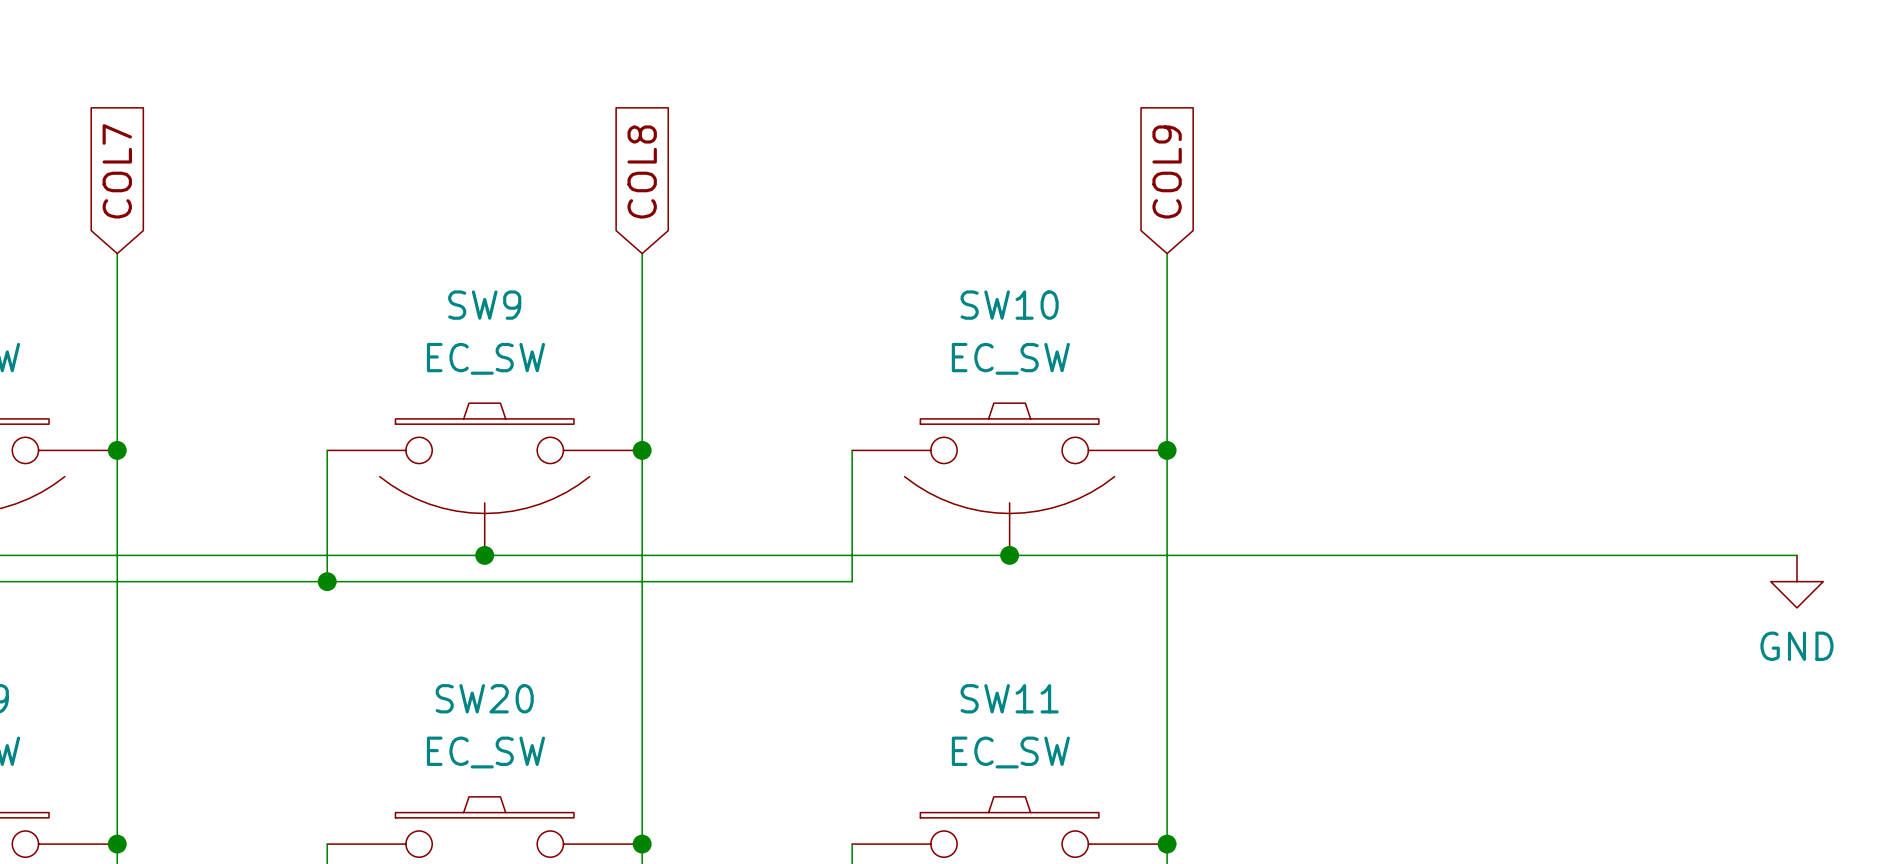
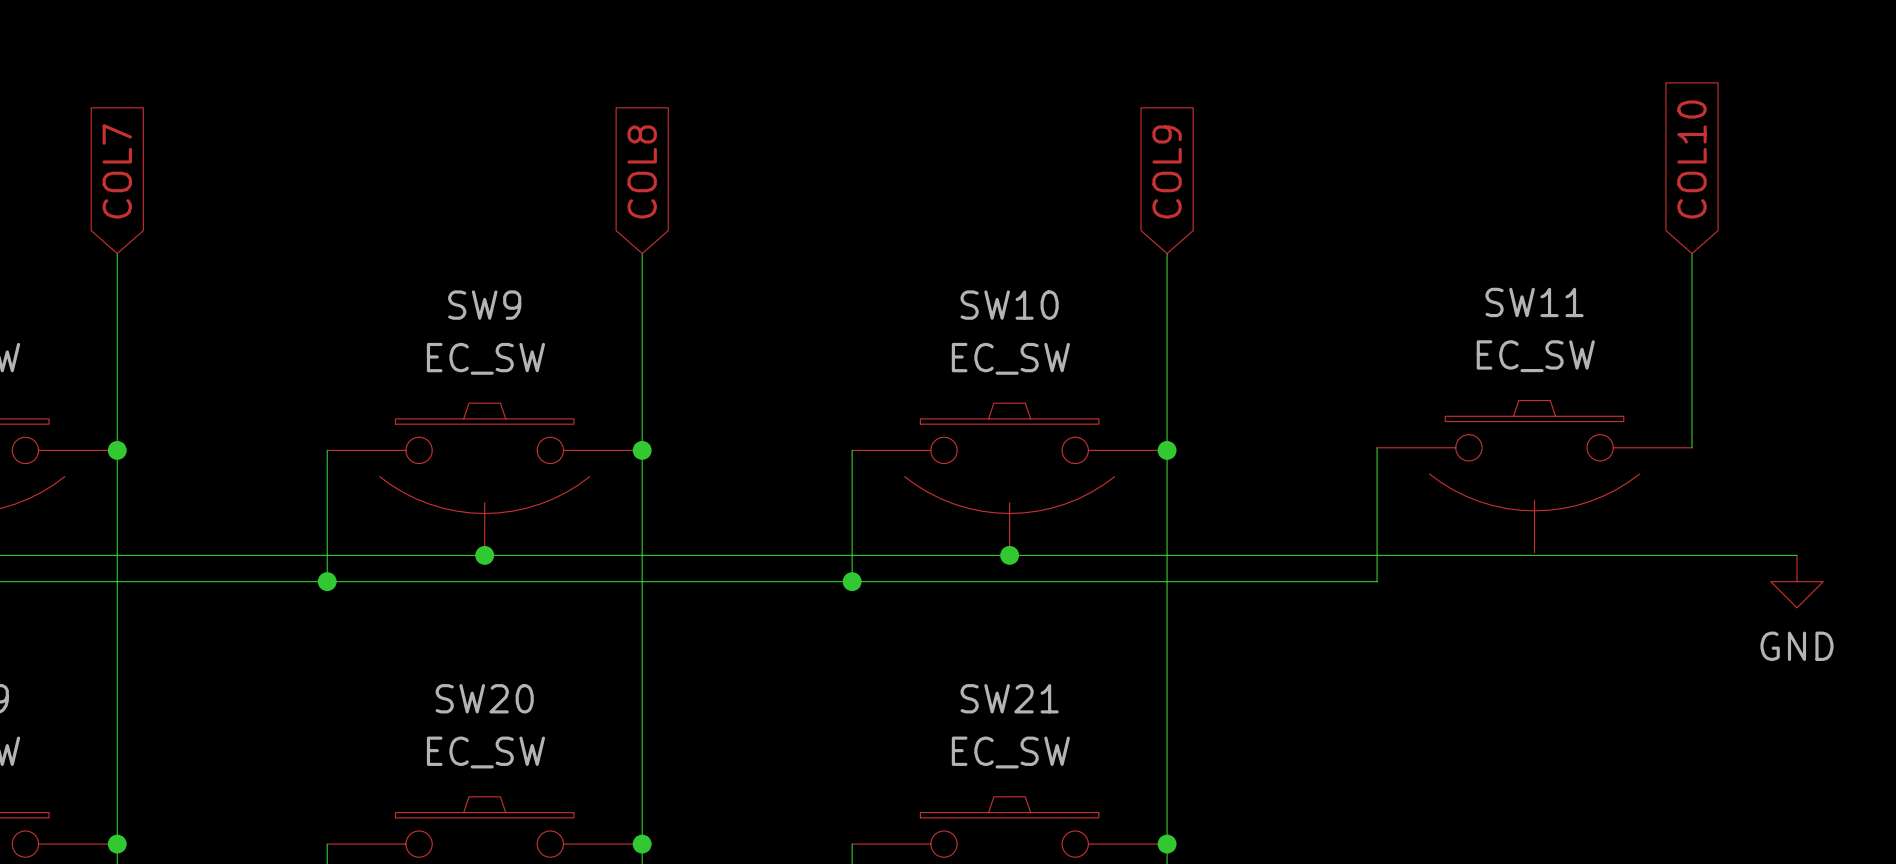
global label: none -> COL10 (1692, 159)
wire: none -> (1692, 253) (1692, 447)
wire: none -> (1377, 447) (1377, 581) (852, 581)
SW11: none -> EC_SW (1534, 476)
junction: none -> (852, 581)
SW11 name: SW11 (1009, 698) -> SW21 (1009, 698)

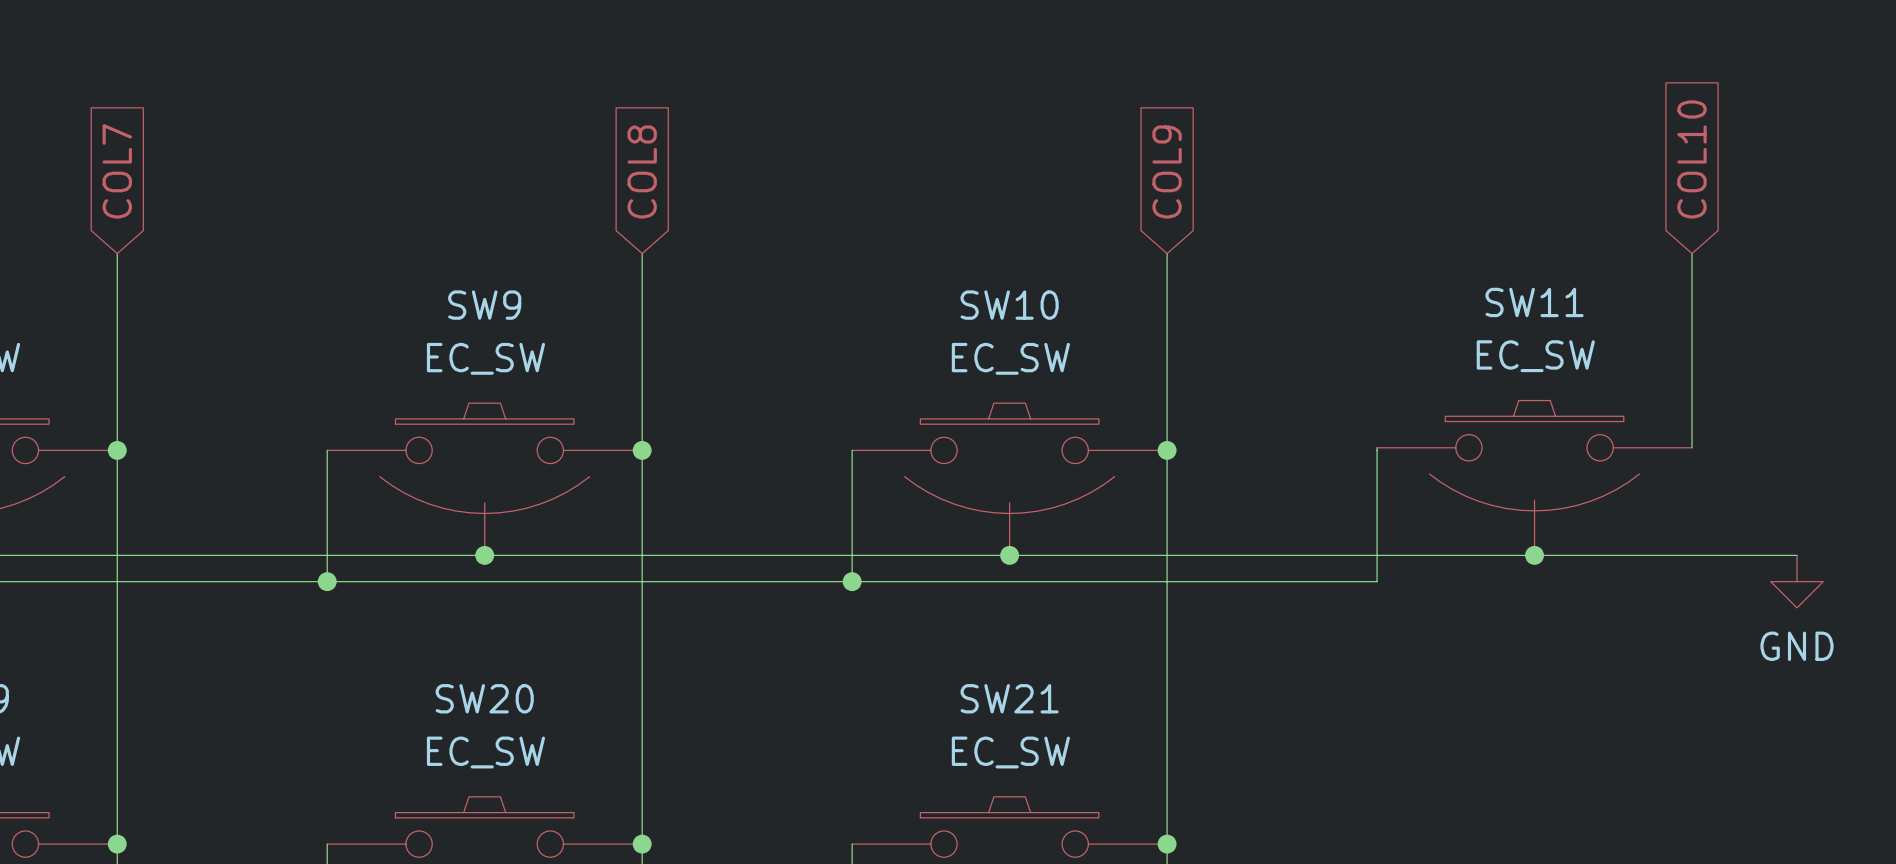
junction: none -> (1534, 555)

